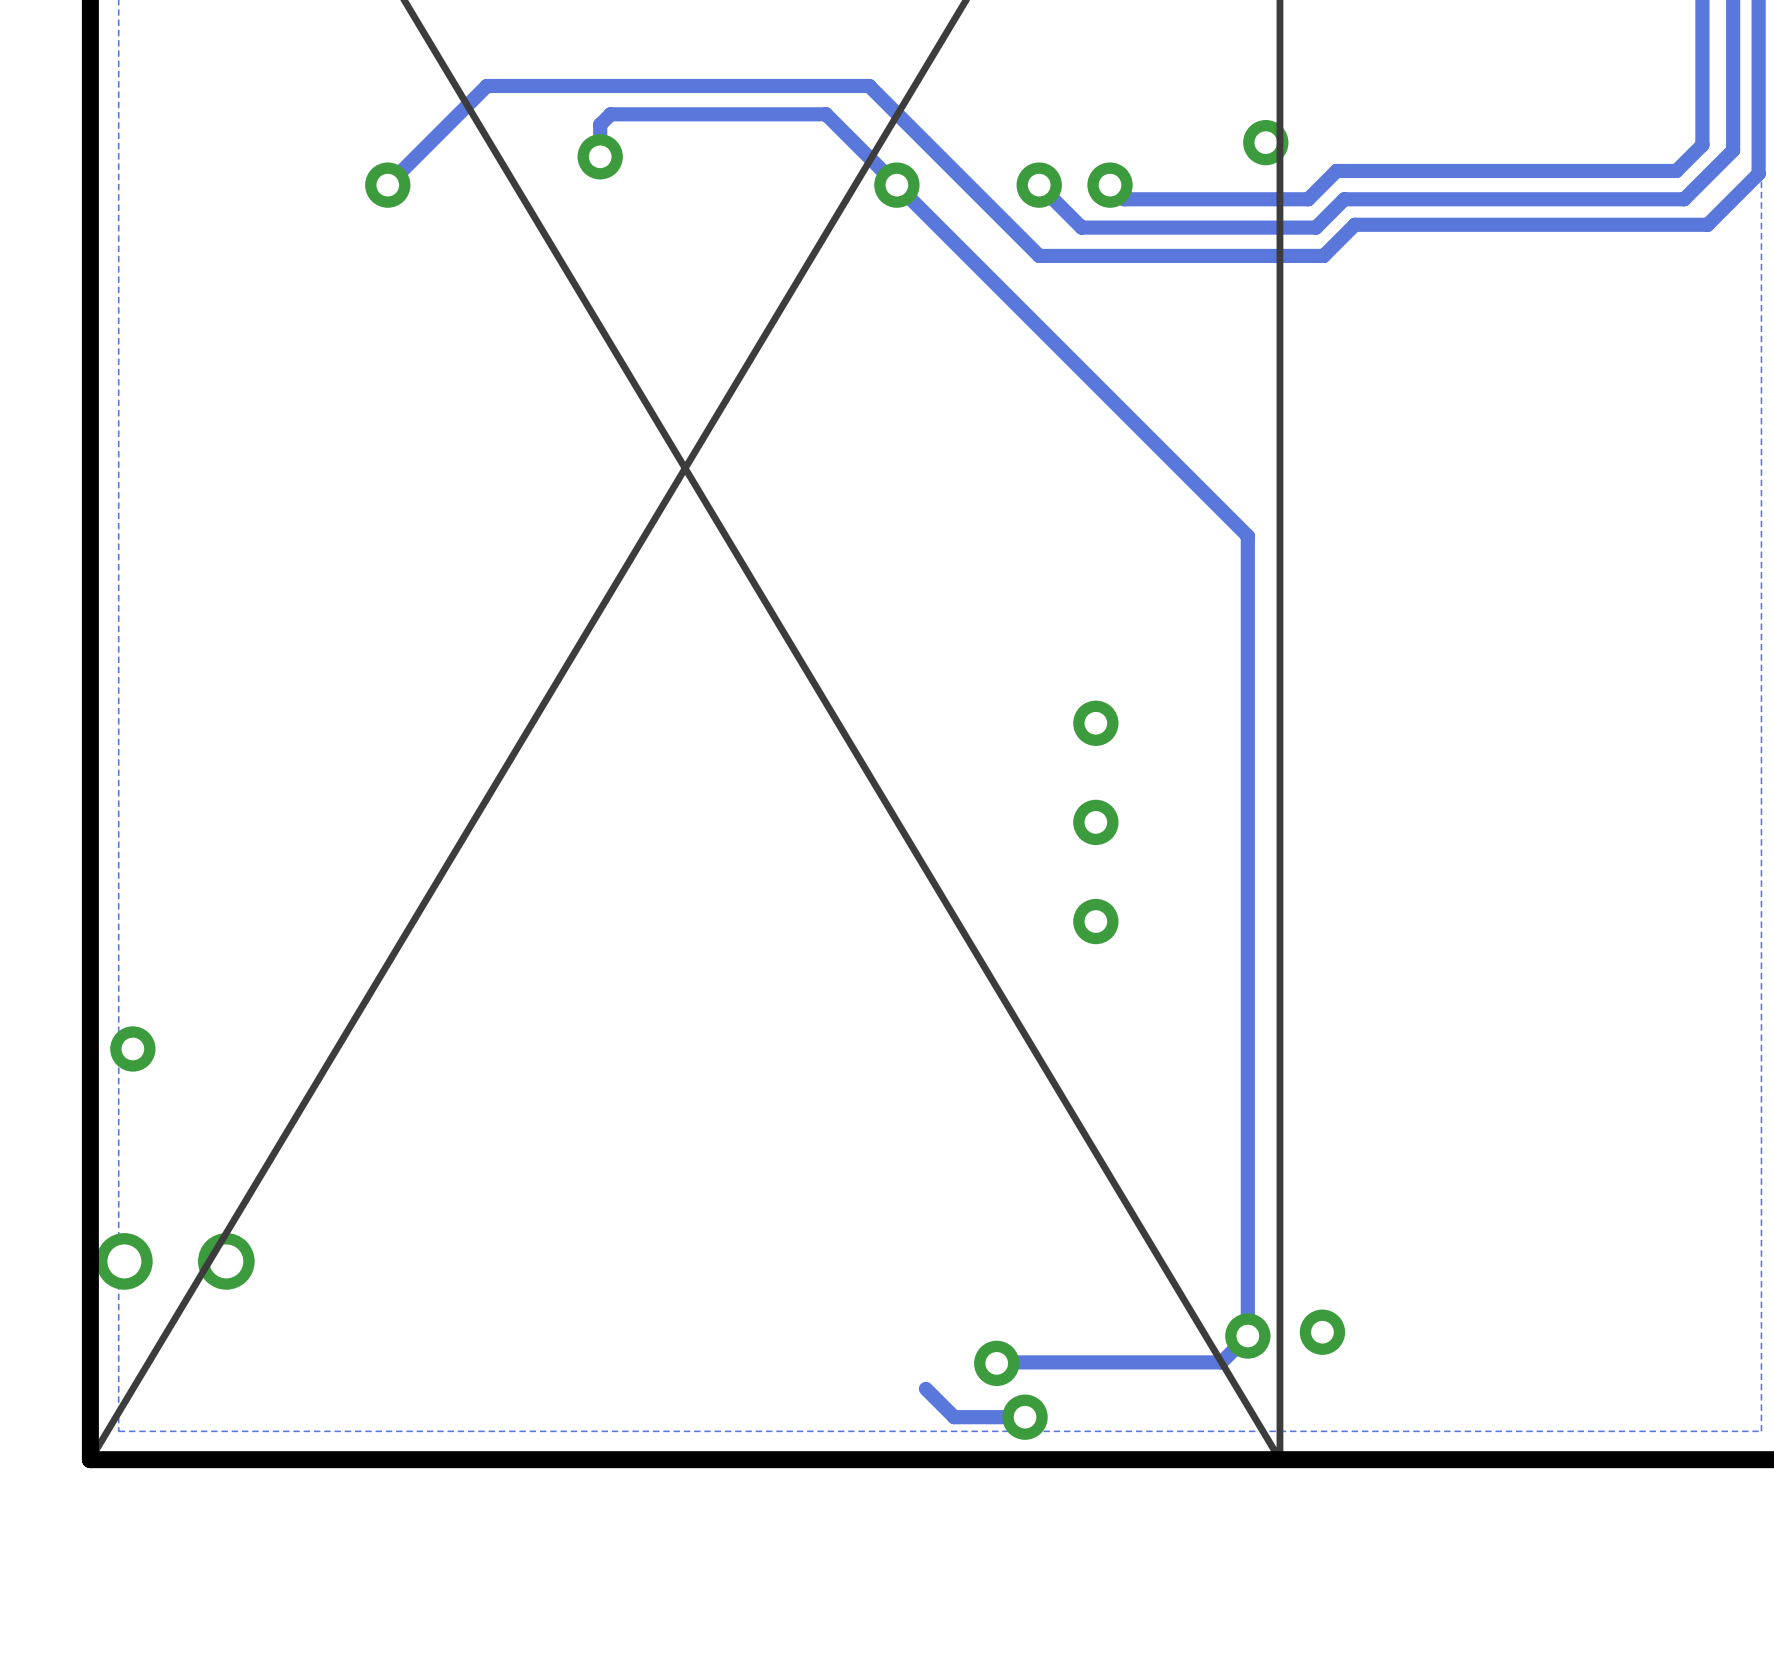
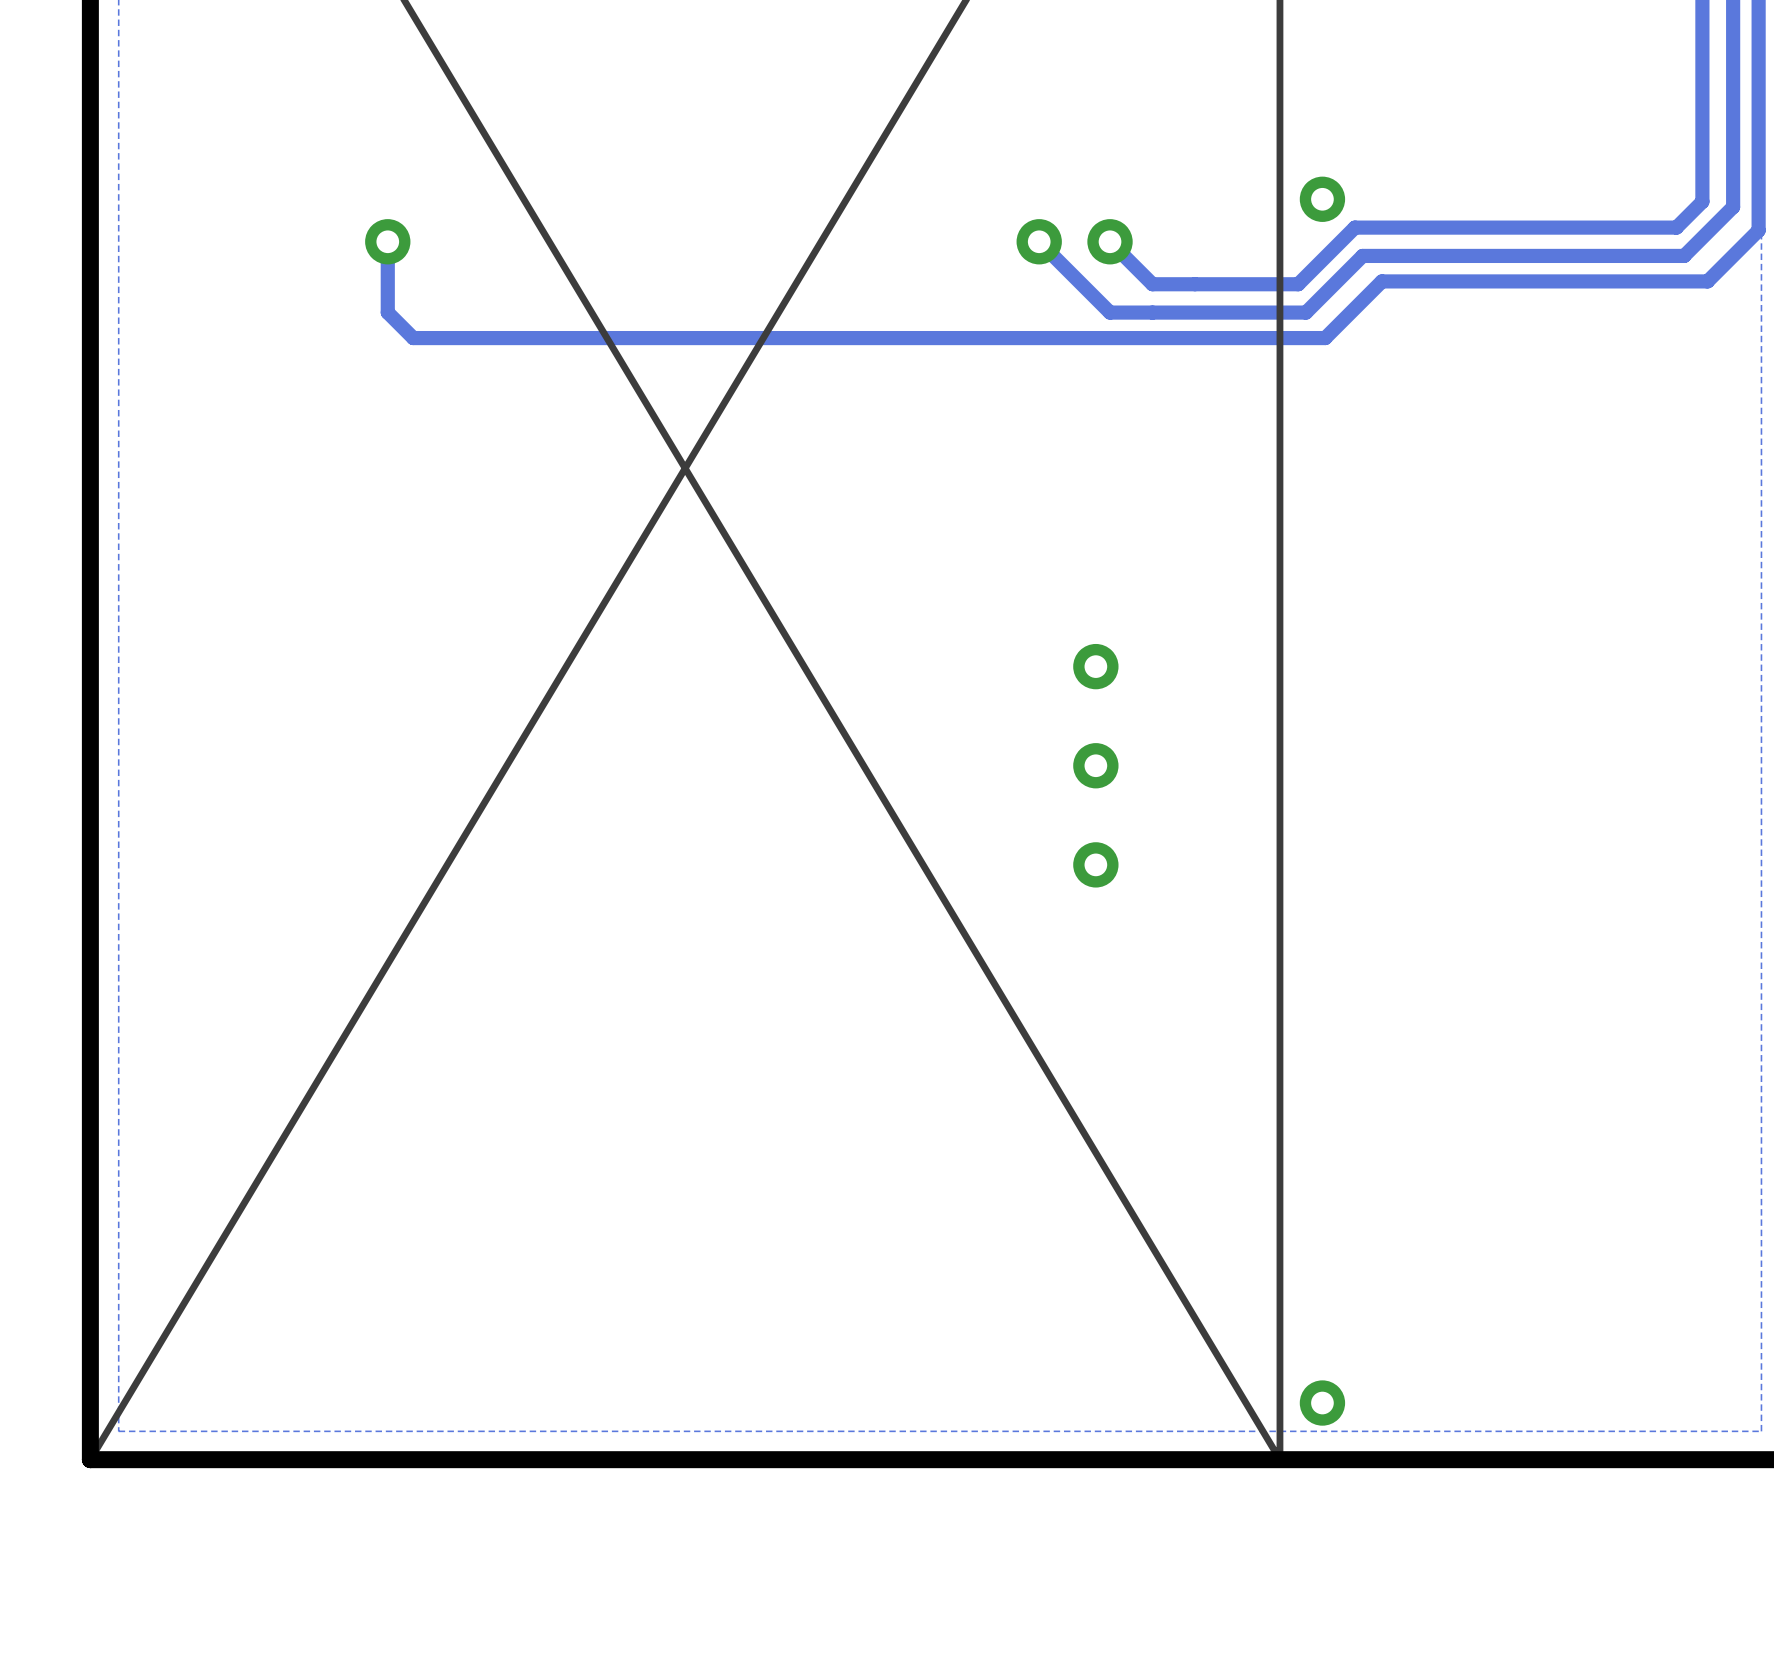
via position: (1265, 142) -> (1322, 199)
track: (1702, 145) (1676, 170) (1336, 170) (1308, 199) (1124, 199) (1110, 185) -> (1702, 145) (1702, 201) (1676, 227) (1354, 227) (1298, 284) (1152, 284) (1110, 241)
track: (1733, 150) (1684, 199) (1344, 199) (1316, 227) (1081, 227) (1039, 185) -> (1733, 150) (1733, 207) (1684, 255) (1362, 255) (1305, 312) (1110, 312) (1039, 241)
track: (600, 156) (600, 124) (610, 114) (826, 114) (1247, 536) (1247, 1336) (1221, 1362) (996, 1363) -> none
via: (600, 156) -> none
track: (1758, 173) (1707, 224) (1354, 224) (1323, 255) (1039, 255) (869, 85) (486, 85) (387, 185) -> (1758, 173) (1758, 230) (1707, 281) (1381, 281) (1325, 338) (413, 338) (387, 312) (387, 241)
via position: (387, 185) -> (387, 241)
via: (896, 185) -> none
via: (1039, 185) -> none
via: (1110, 185) -> none
via: none -> (1039, 241)
via: none -> (1110, 241)
via: none -> (1095, 666)
via position: (1095, 723) -> (1095, 765)
via position: (1095, 822) -> (1095, 864)
via: (1095, 921) -> none
via: (132, 1048) -> none
part: (175, 1261) -> none
via: (1322, 1332) -> none
via: (1247, 1336) -> none
via: (996, 1363) -> none
track: (925, 1388) (954, 1417) (1025, 1417) -> none
via: none -> (1322, 1403)
via: (1025, 1417) -> none

